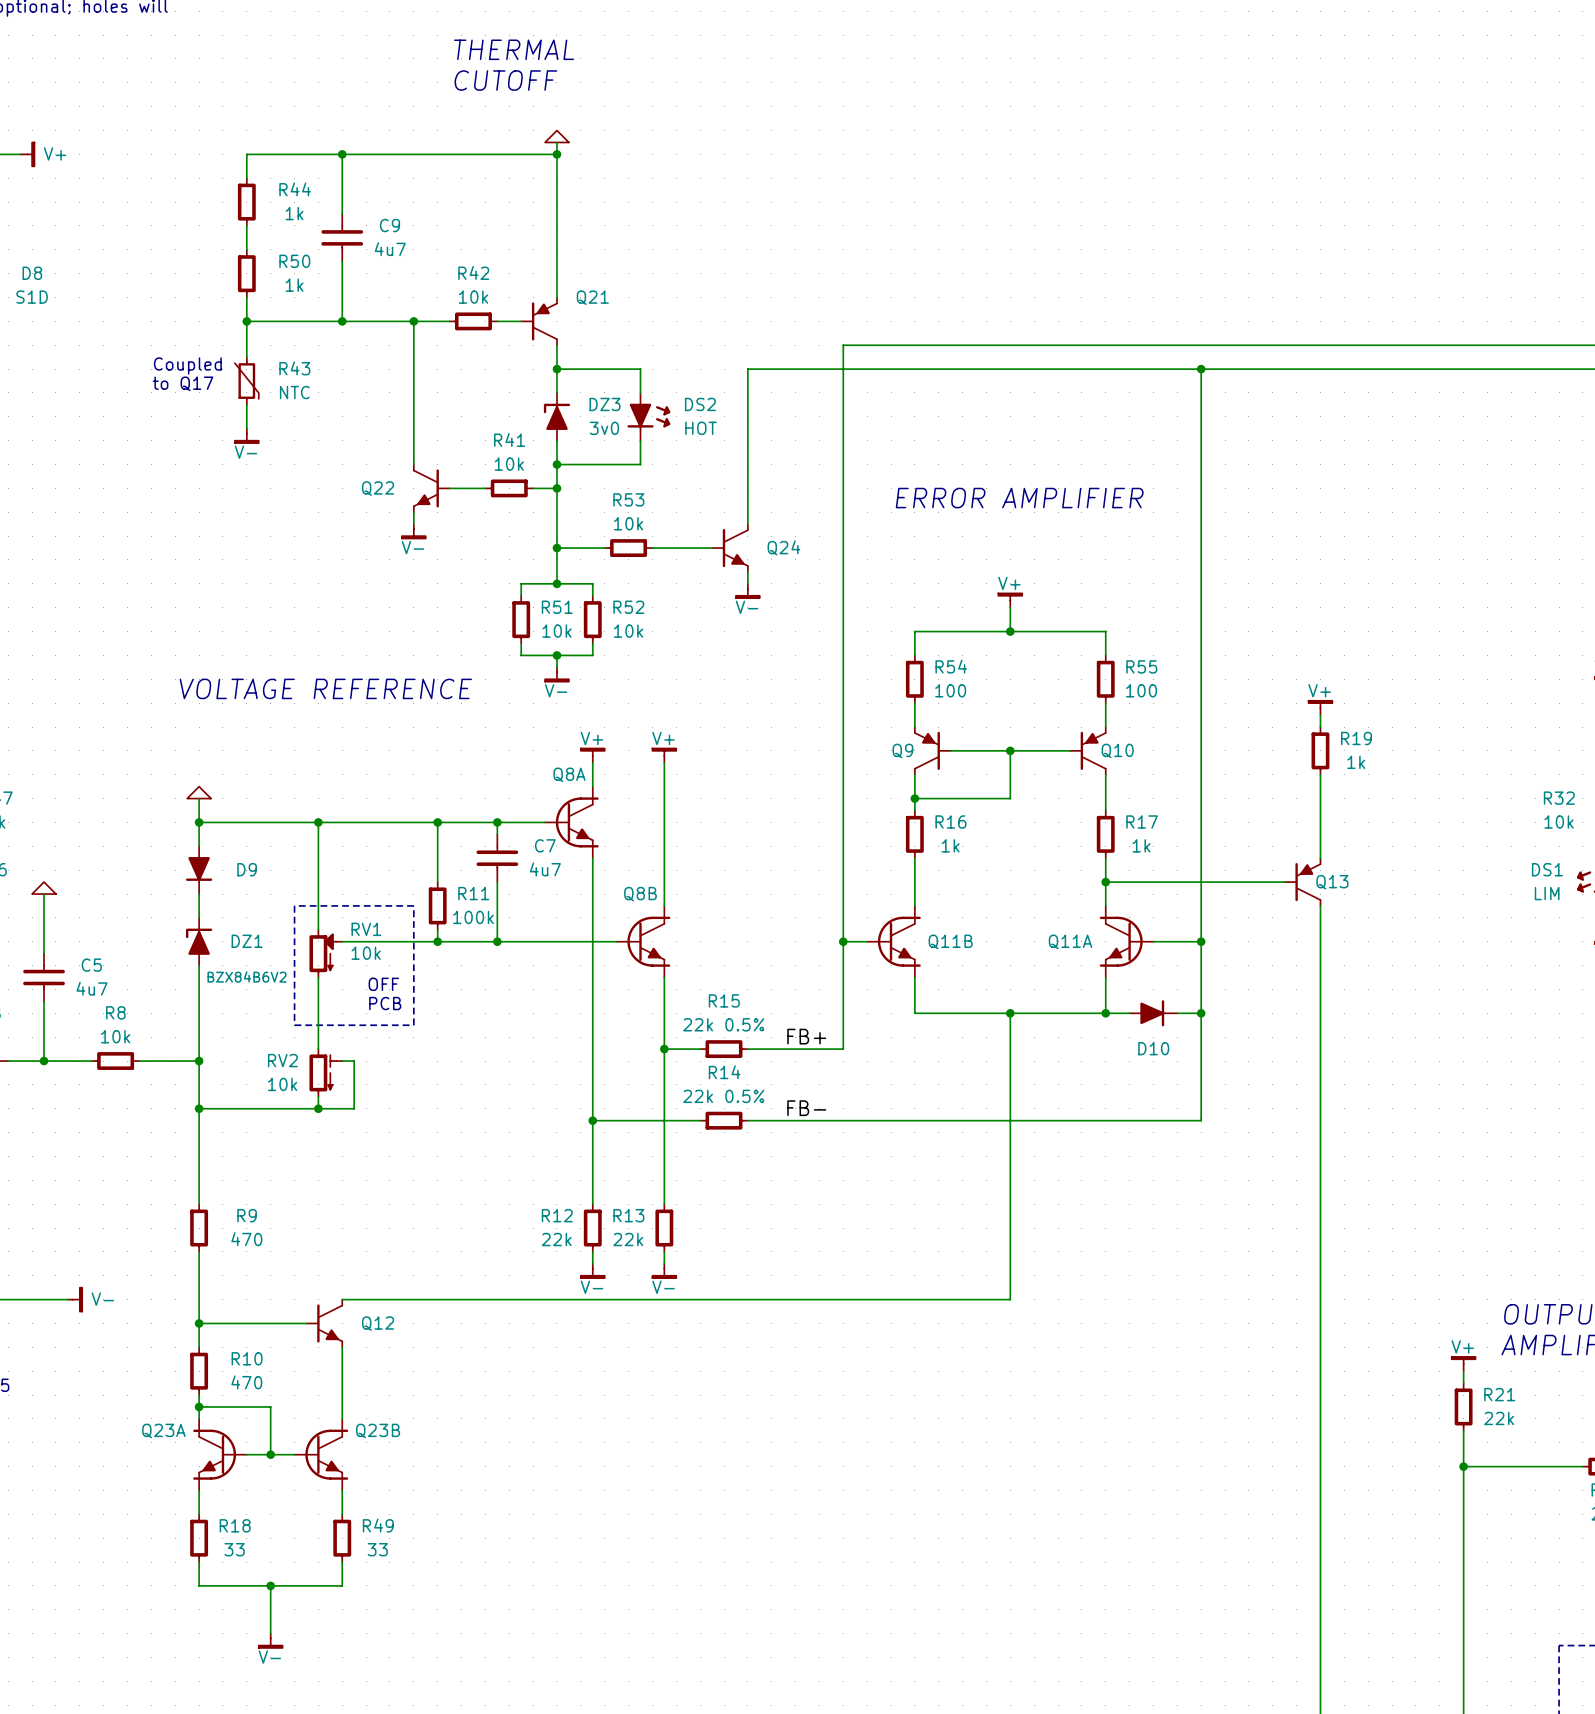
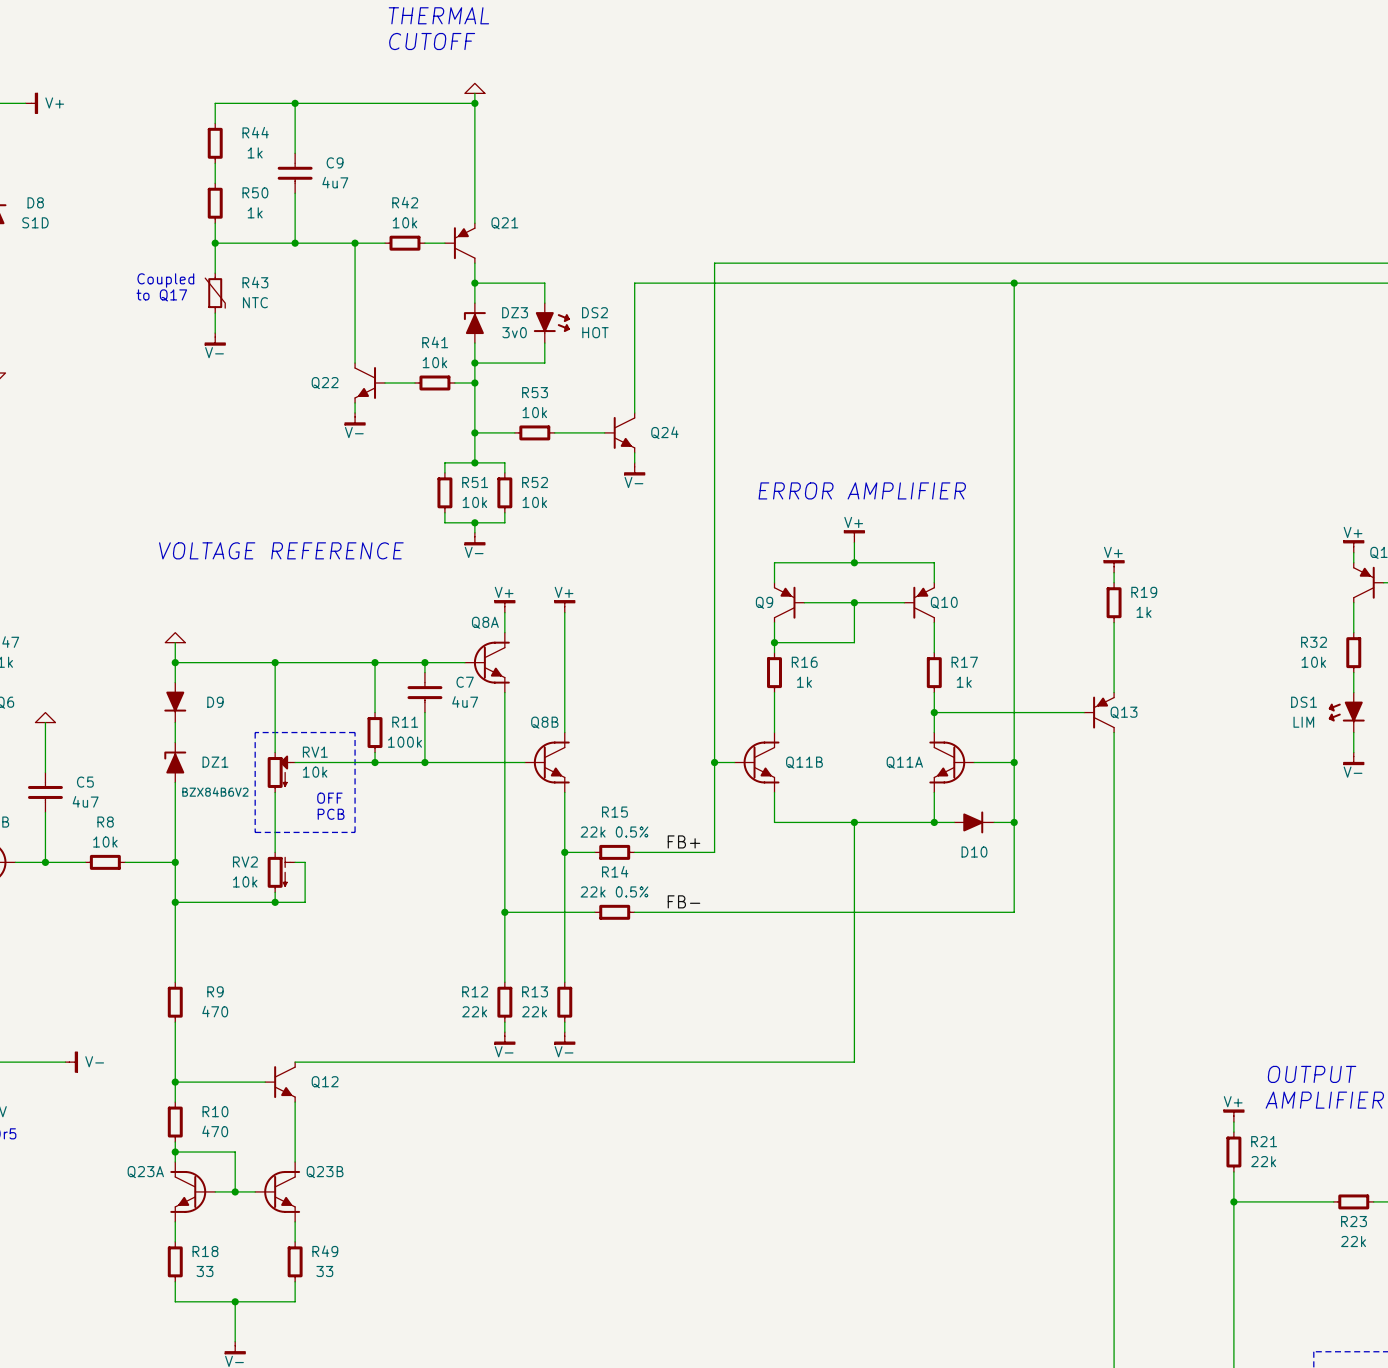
text position: ERROR AMPLIFIER (1019, 498) -> ERROR AMPLIFIER (862, 490)
power symbol position: V+ (1010, 600) -> V+ (854, 536)
wire: (1010, 607) (1010, 631) -> (854, 542) (854, 562)
junction: (1010, 631) -> none
wire: (914, 655) (914, 631) (1105, 631) (1105, 655) -> none
R54: 100 (914, 679) -> none
R55: 100 (1105, 679) -> none
wire: none -> (774, 562) (934, 562)
junction: none -> (854, 562)

